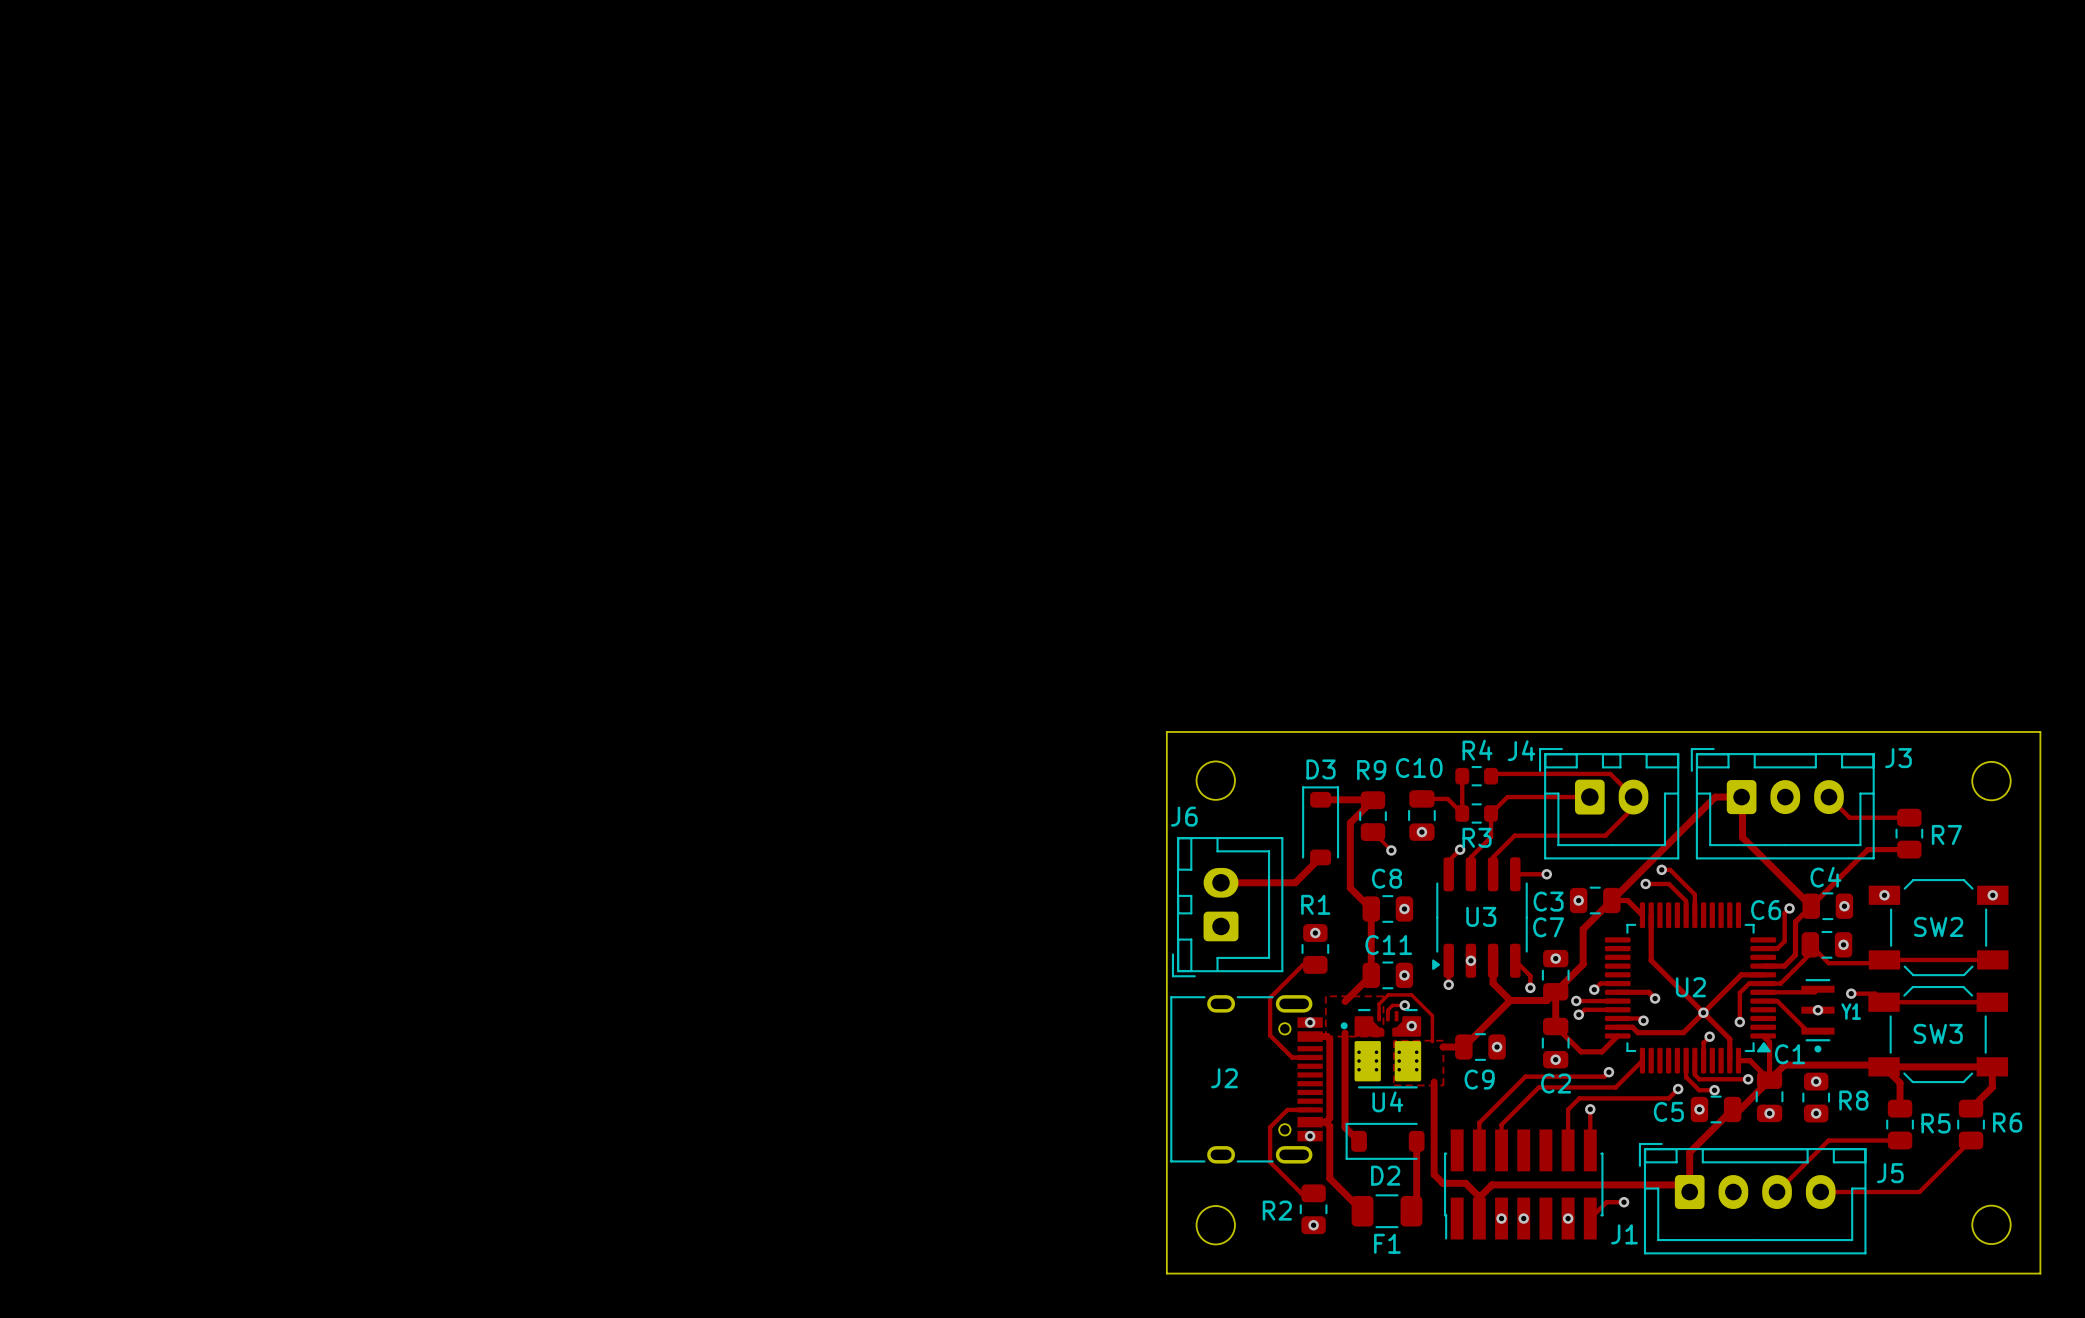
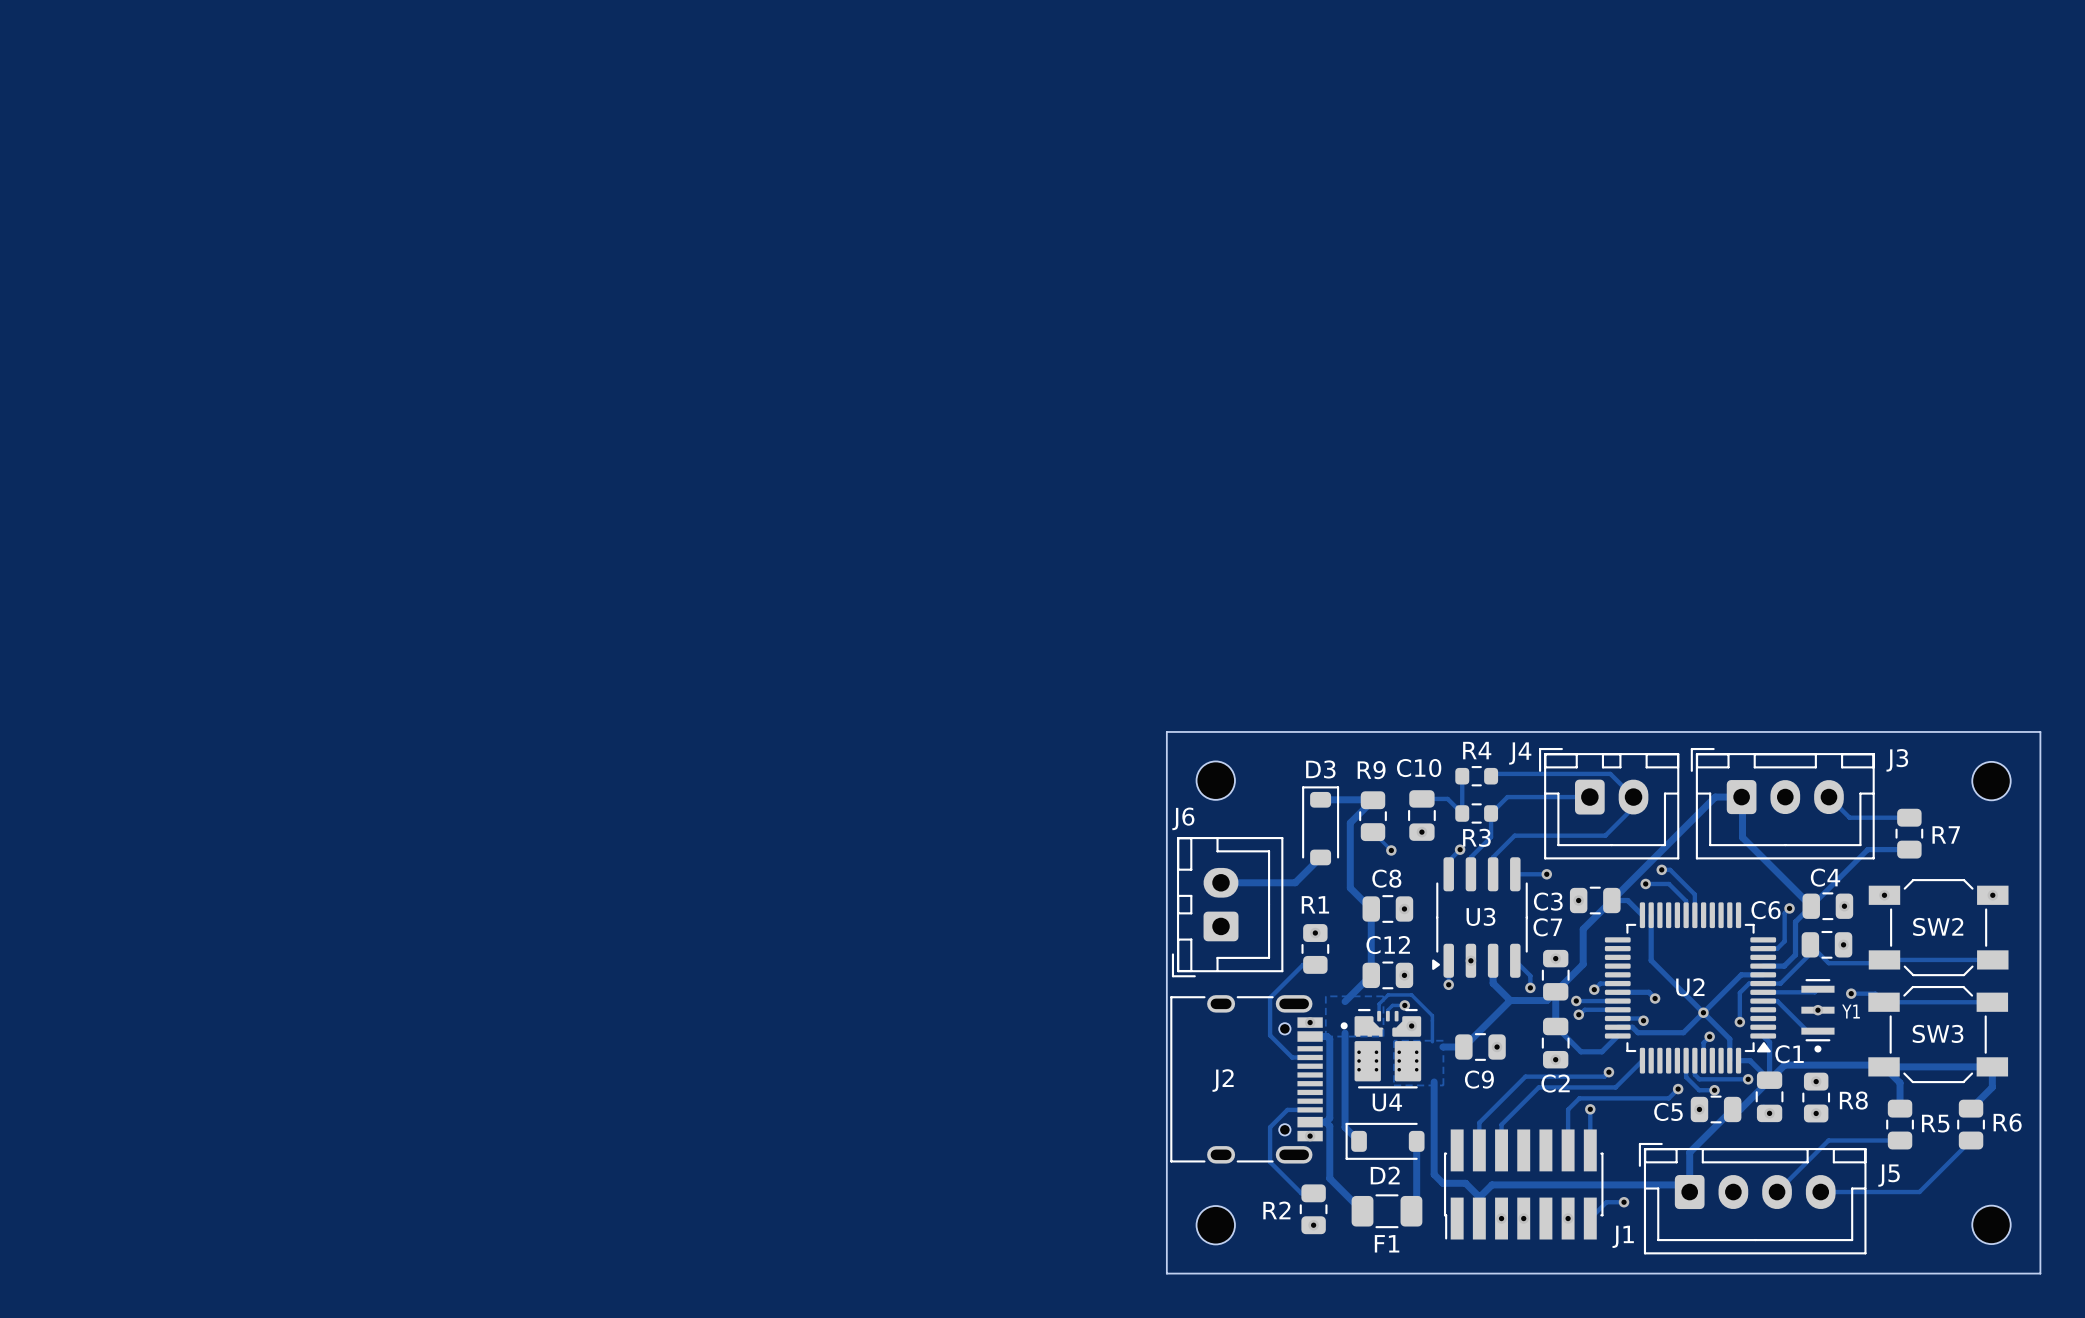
C11 name: C11 (1388, 945) -> C12 (1388, 945)

